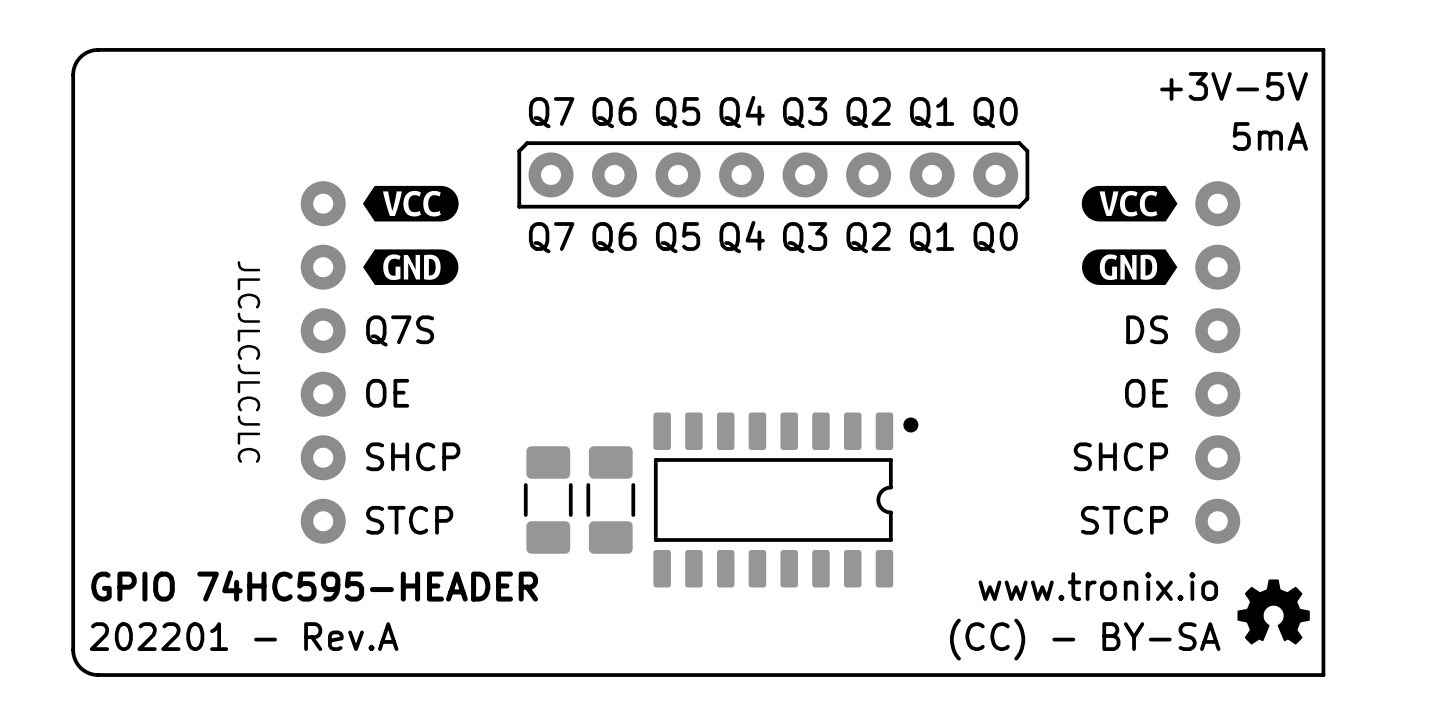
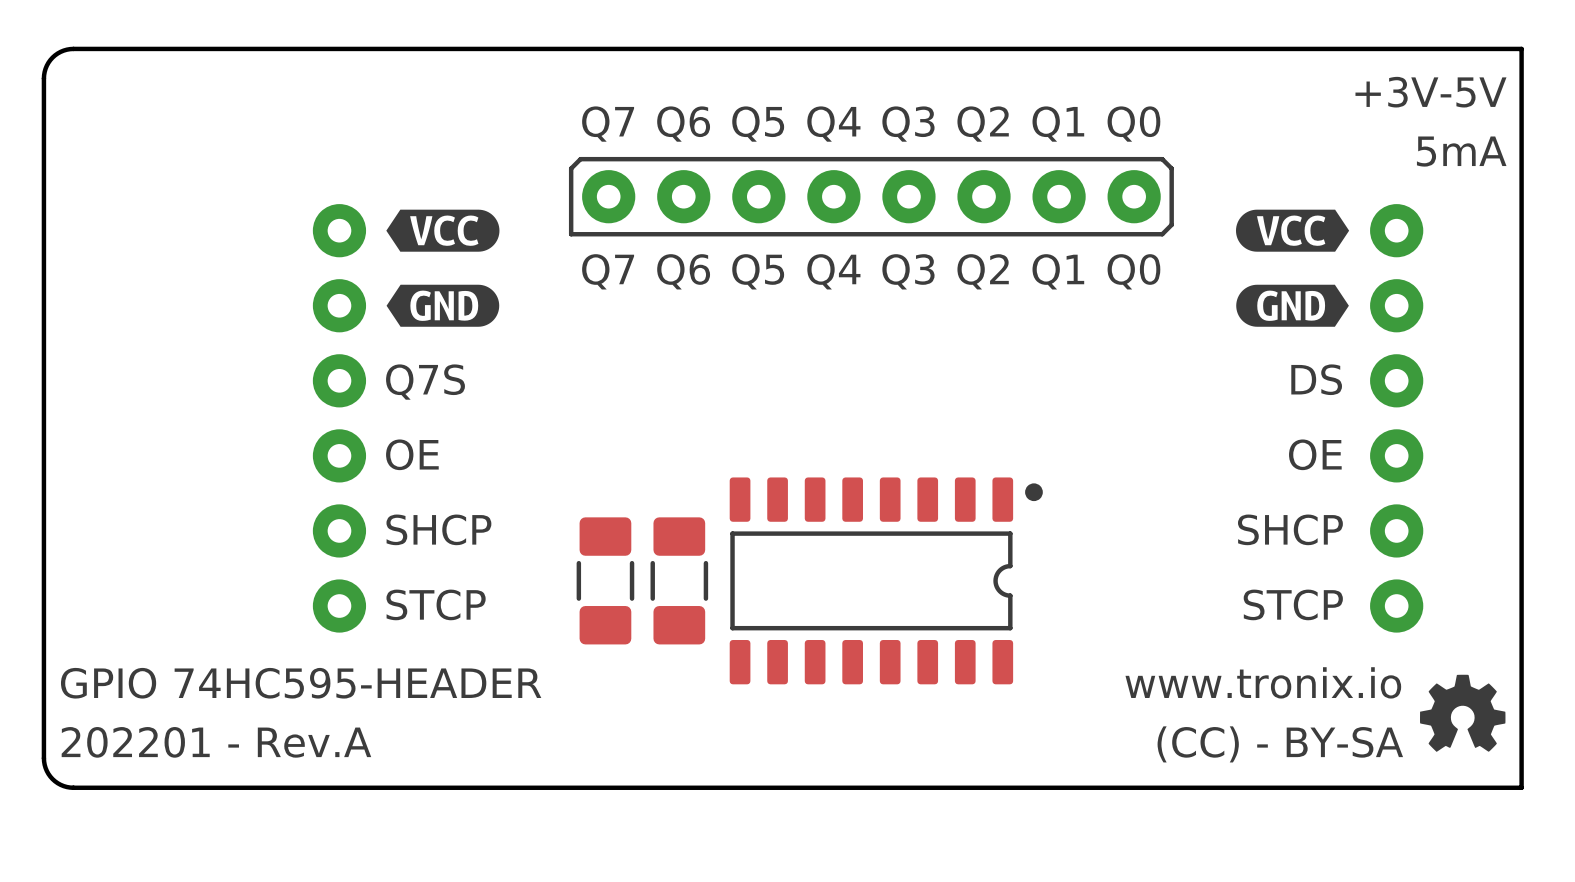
text: JLCJLCJLCJLC (248, 361) -> none

